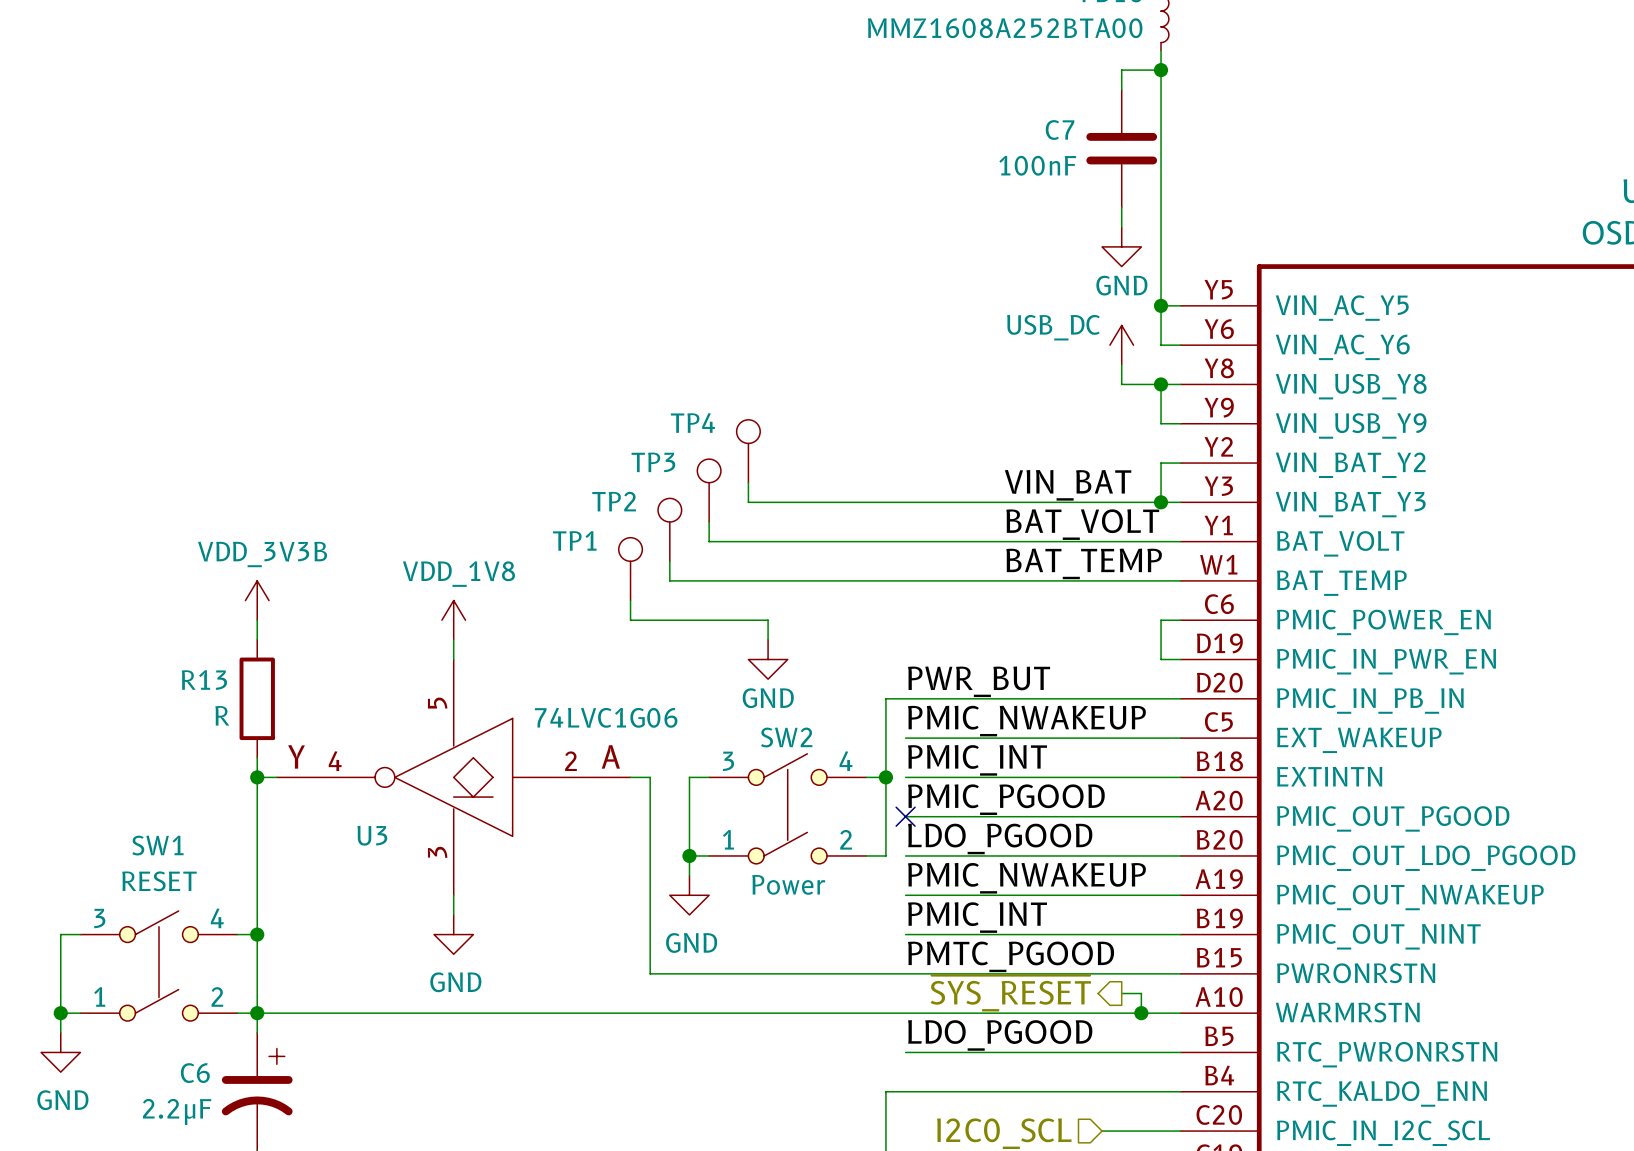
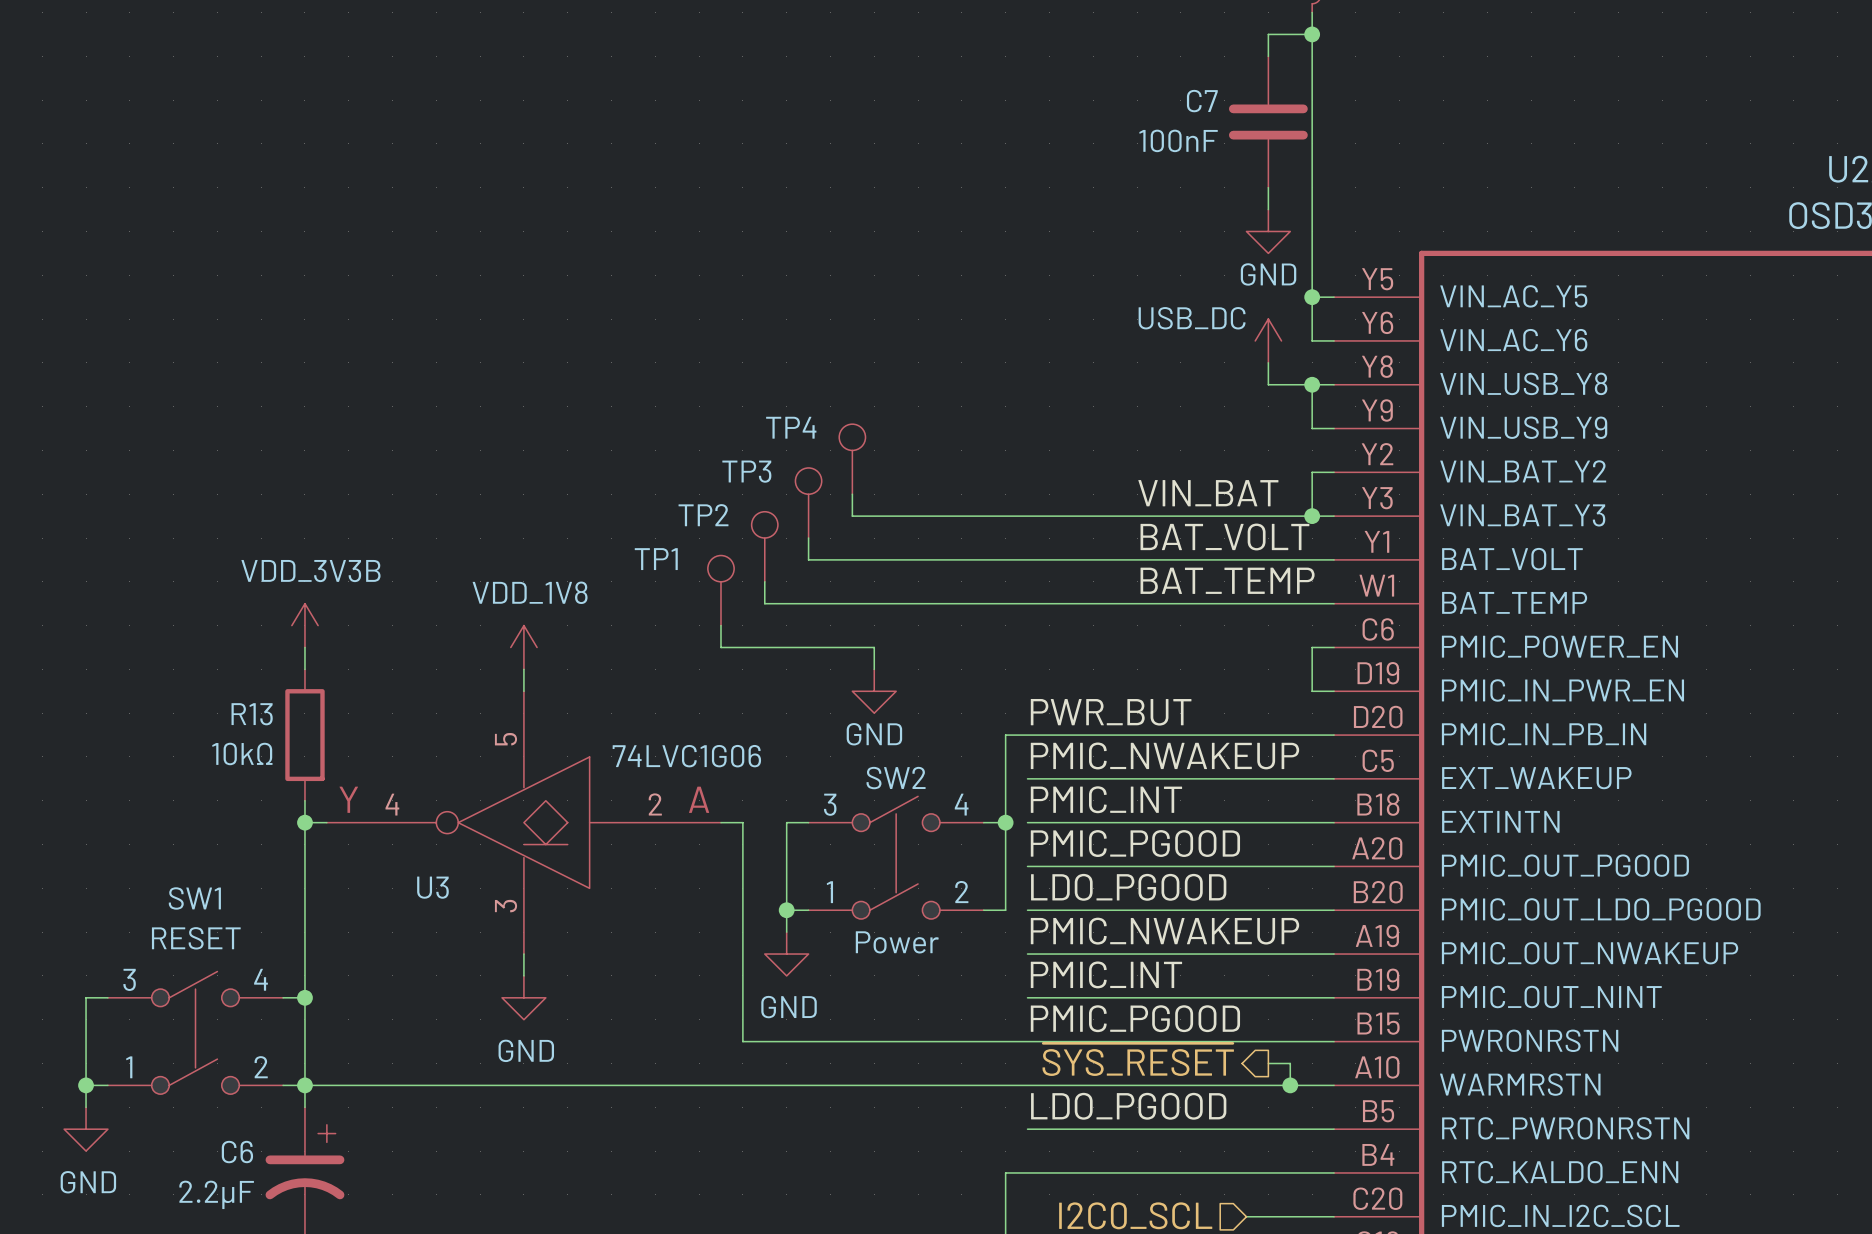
R13 value: R (222, 715) -> 10kΩ (242, 753)
no-connect mark: (905, 816) -> none
label: PMTC_PGOOD (1011, 956) -> PMIC_PGOOD (1135, 1018)

